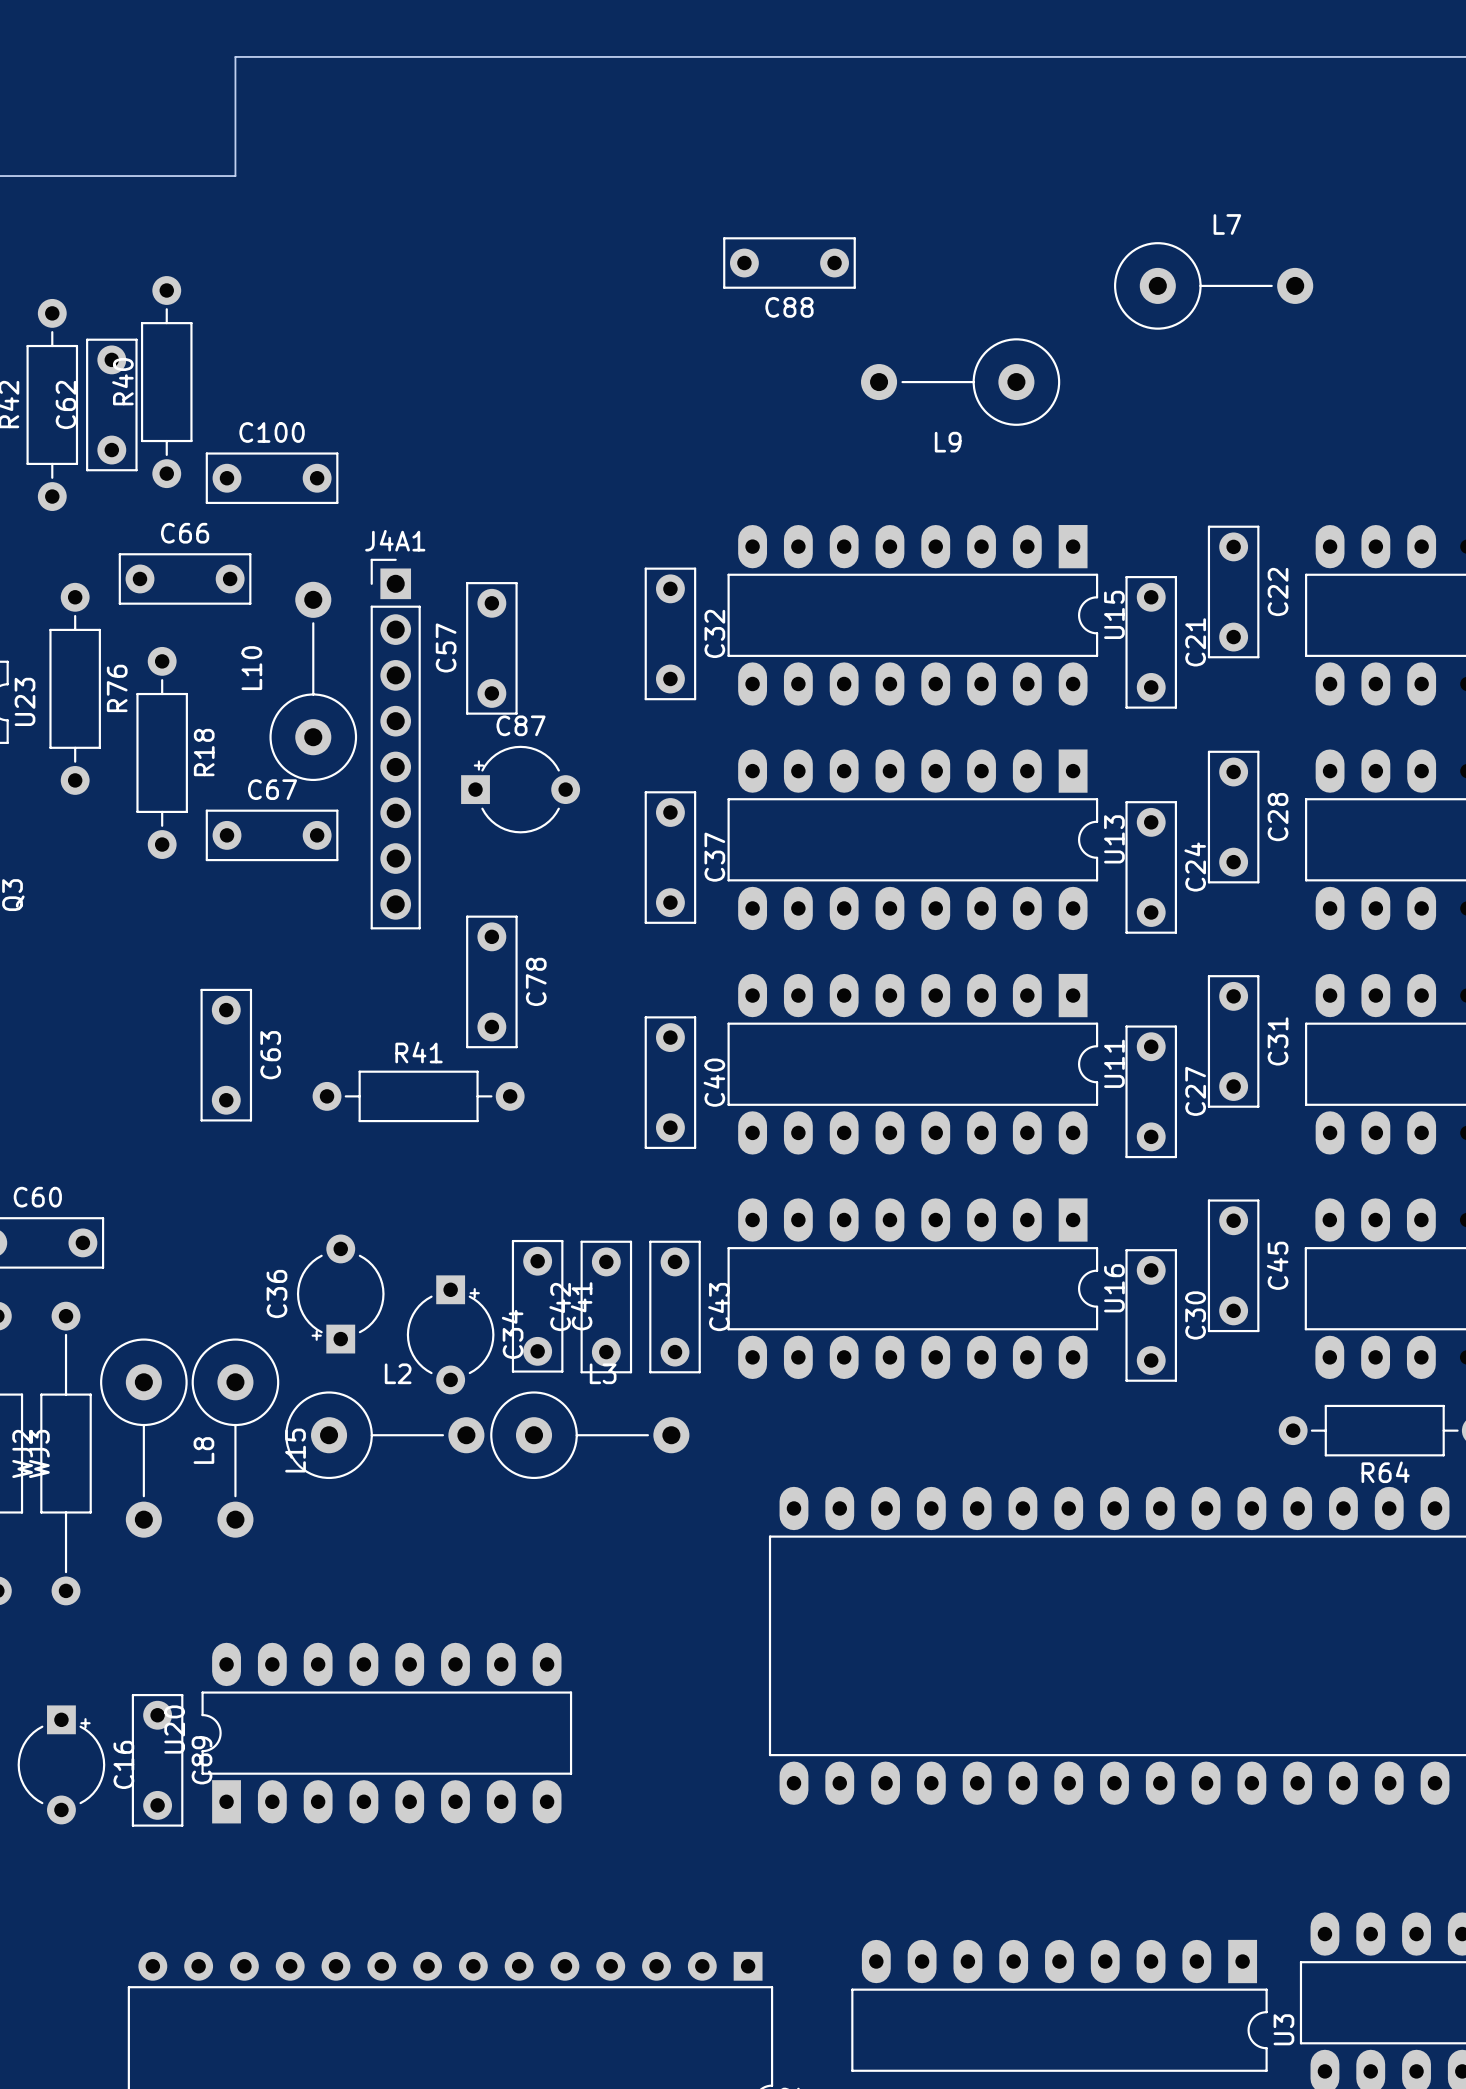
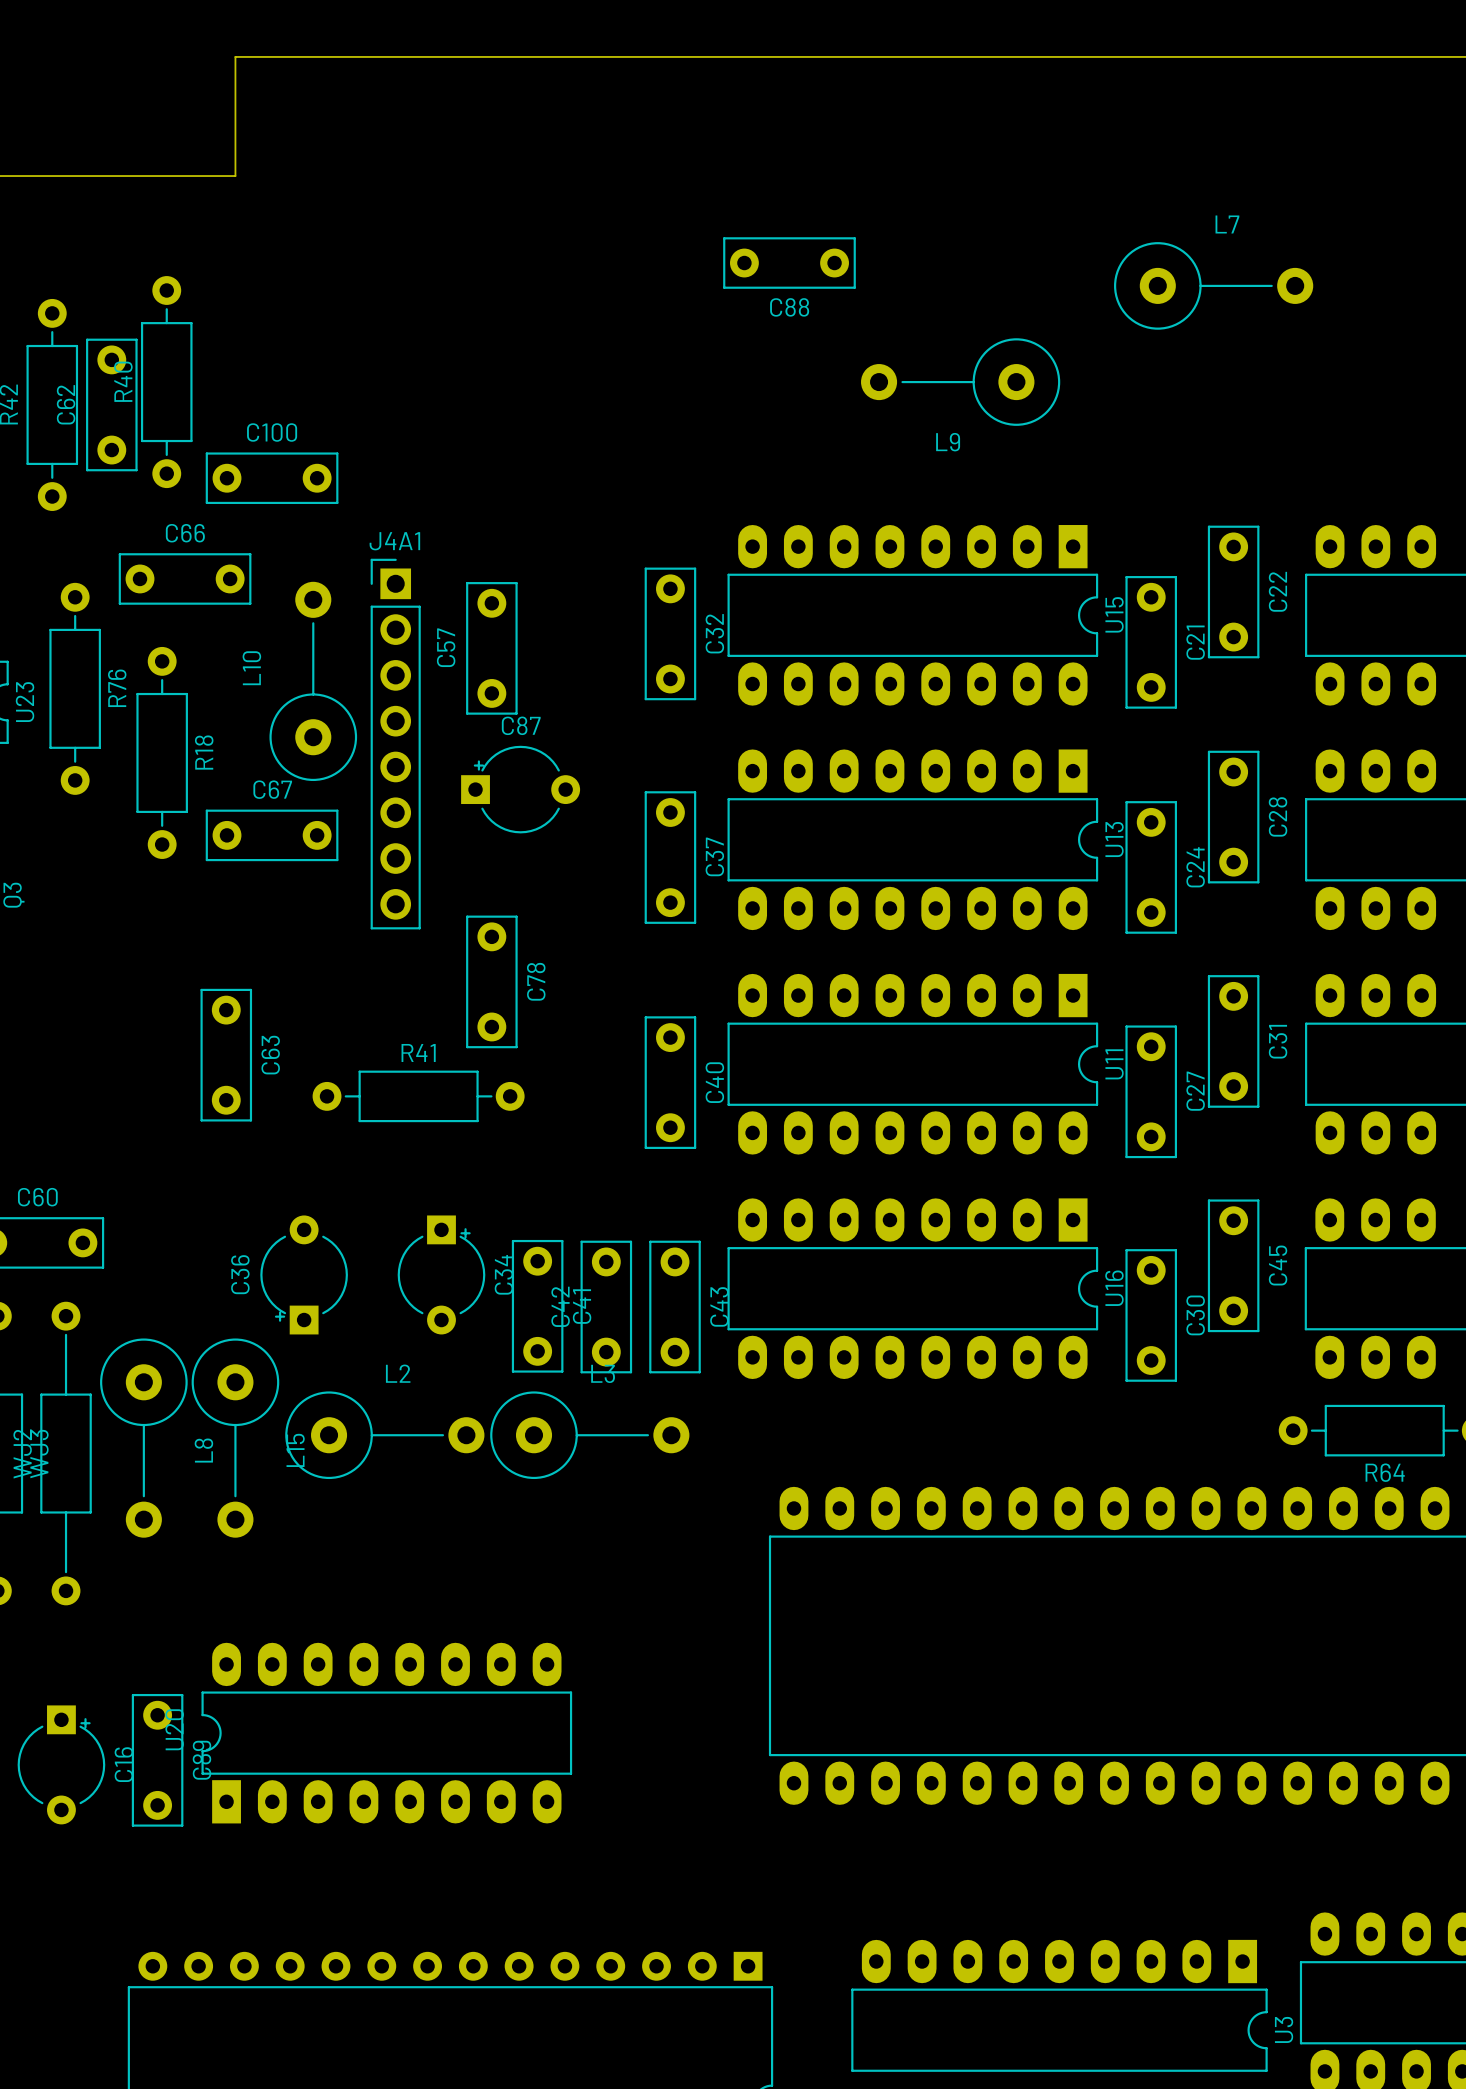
C36 position: (340, 1293) -> (304, 1274)
C34 position: (450, 1334) -> (441, 1274)

